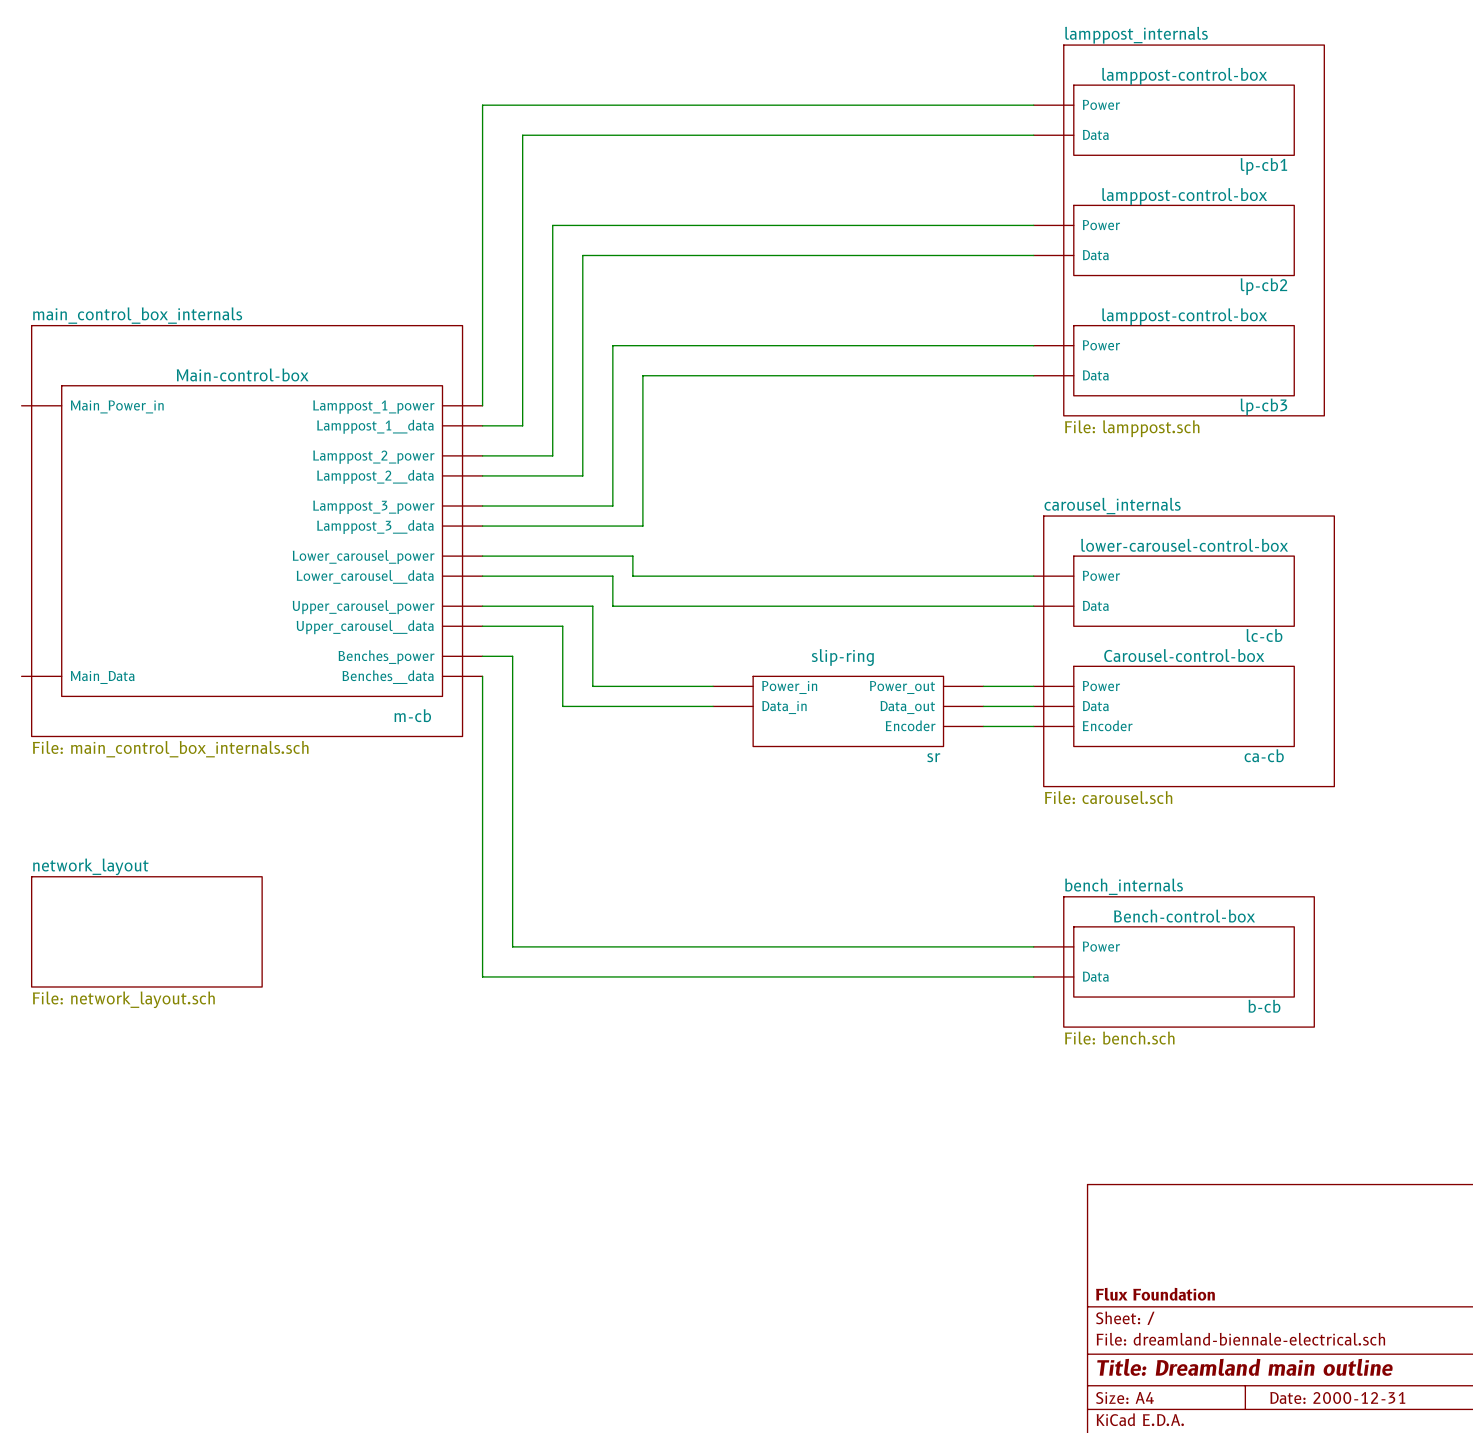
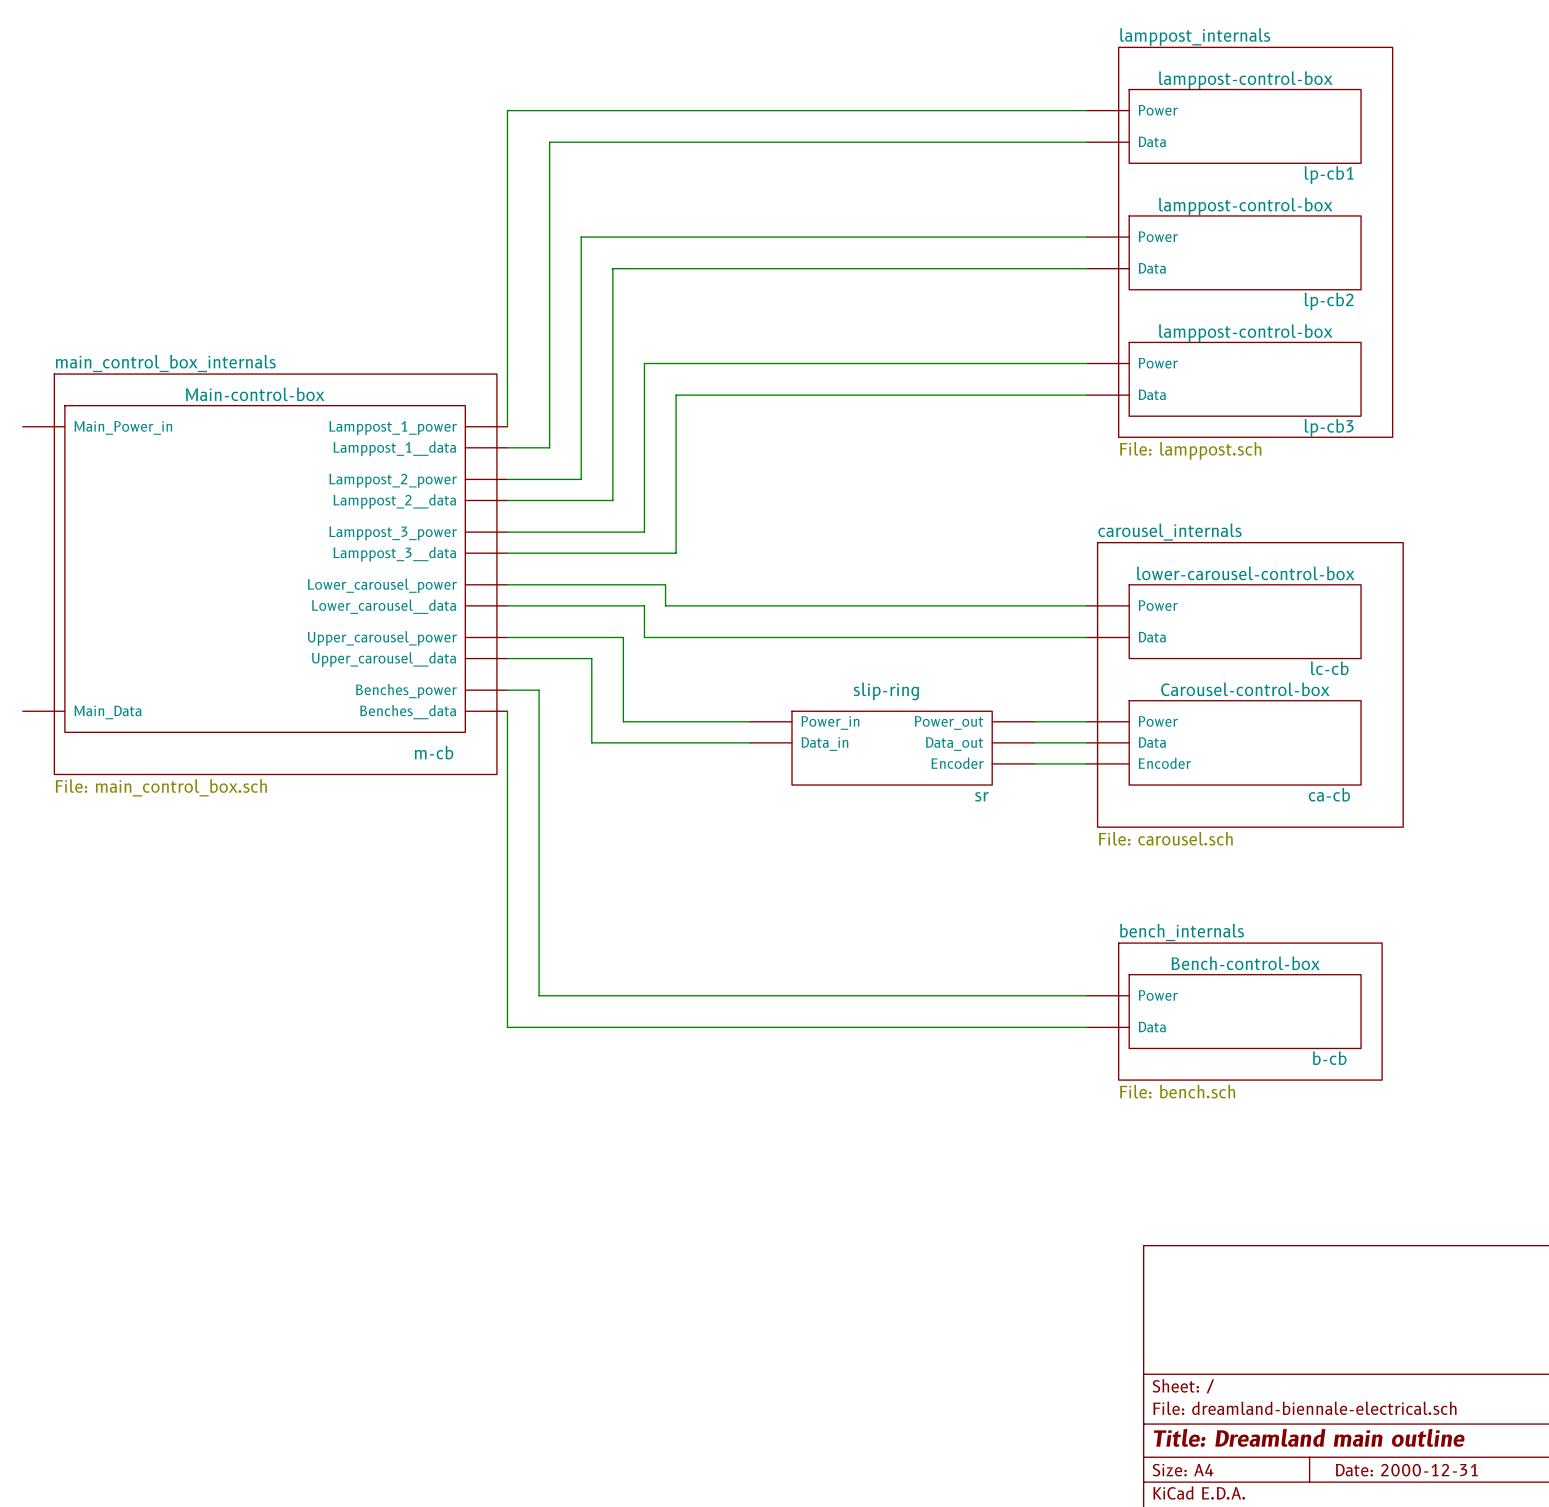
sheet main_control_box_internals: File: main_control_box_internals.sch (247, 531) -> none
sheet main_control_box_internals: none -> File: main_control_box.sch (275, 574)
sheet network_layout: File: network_layout.sch (146, 931) -> none
title block: Flux Foundation (1155, 1294) -> none

